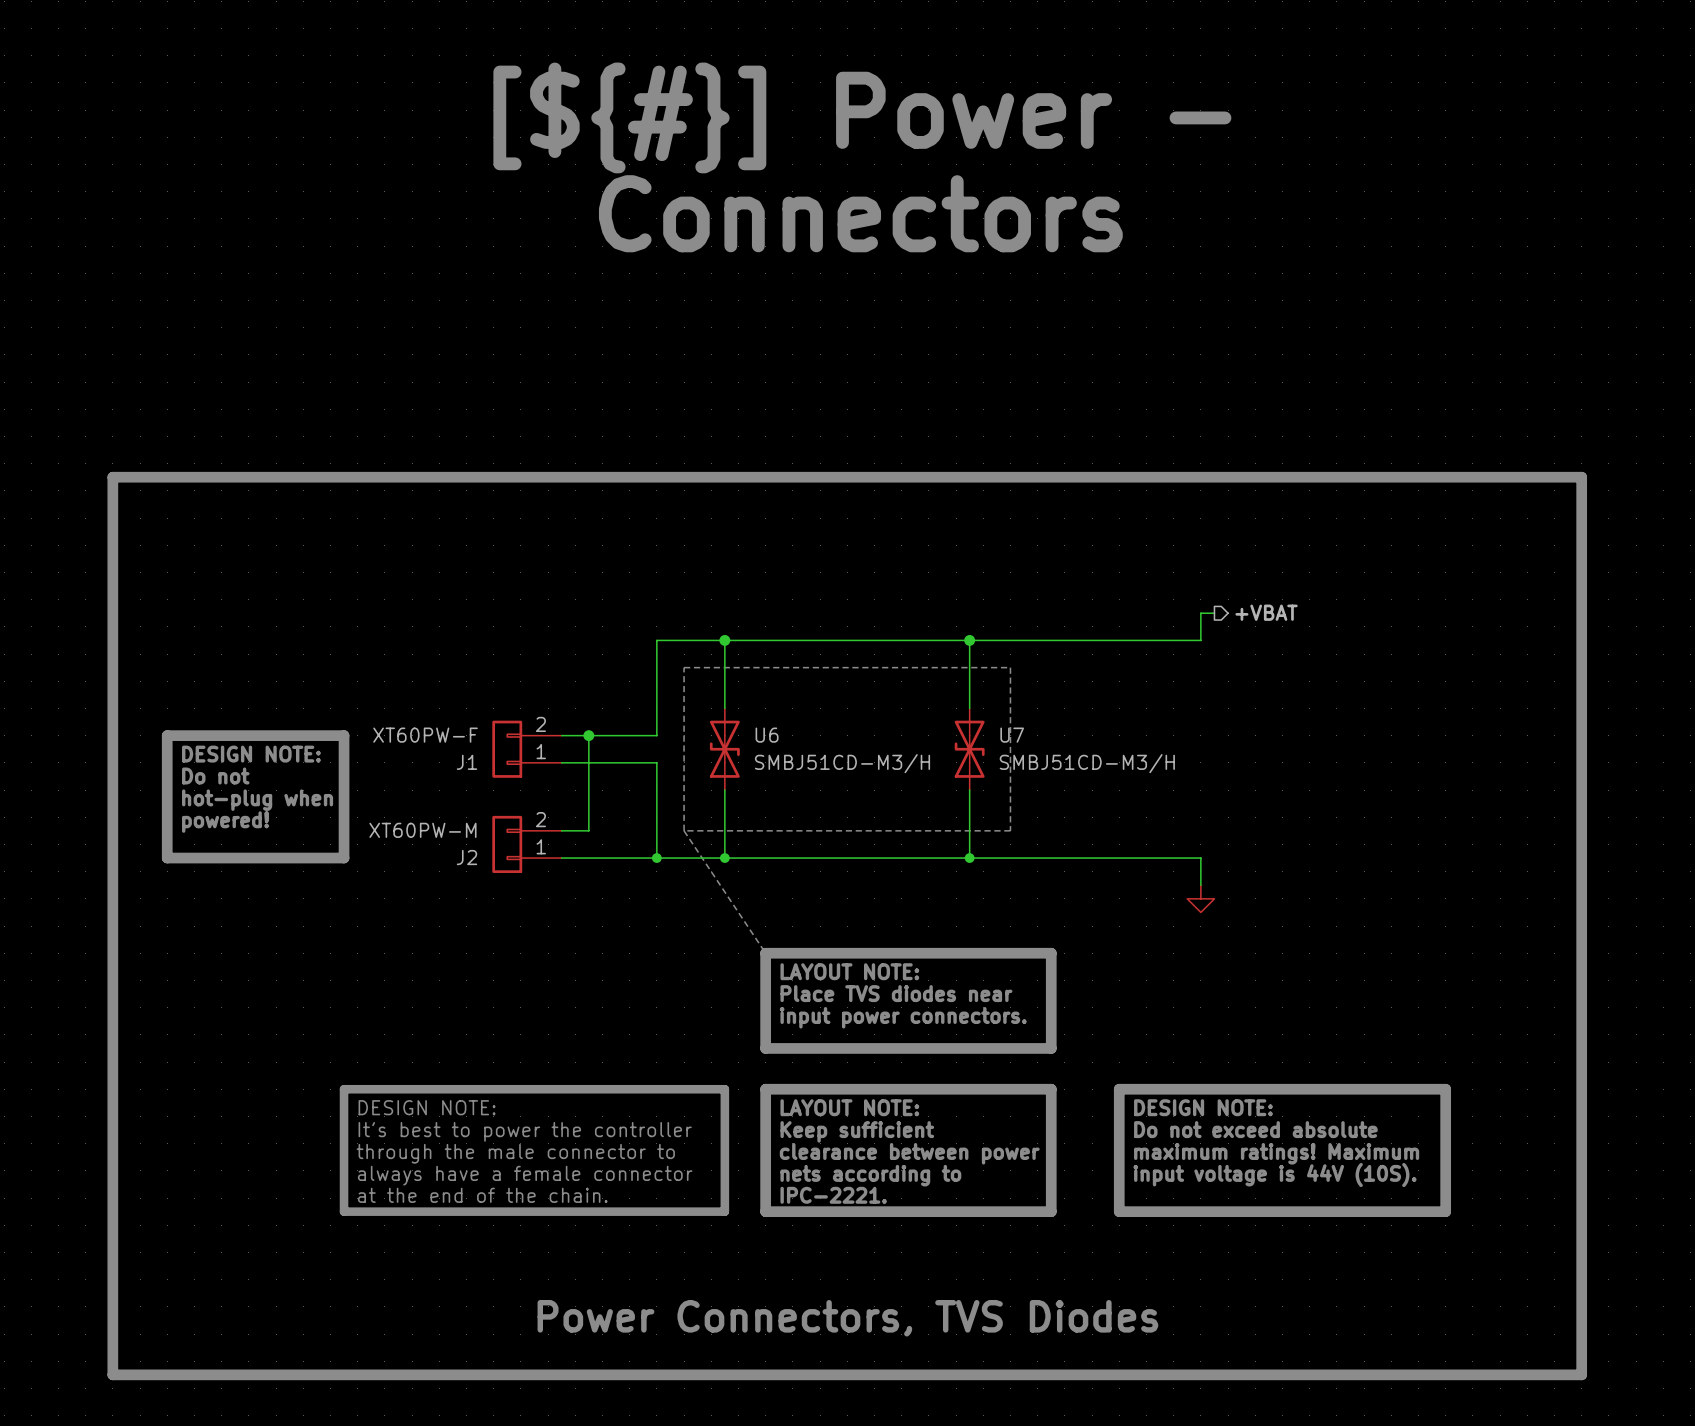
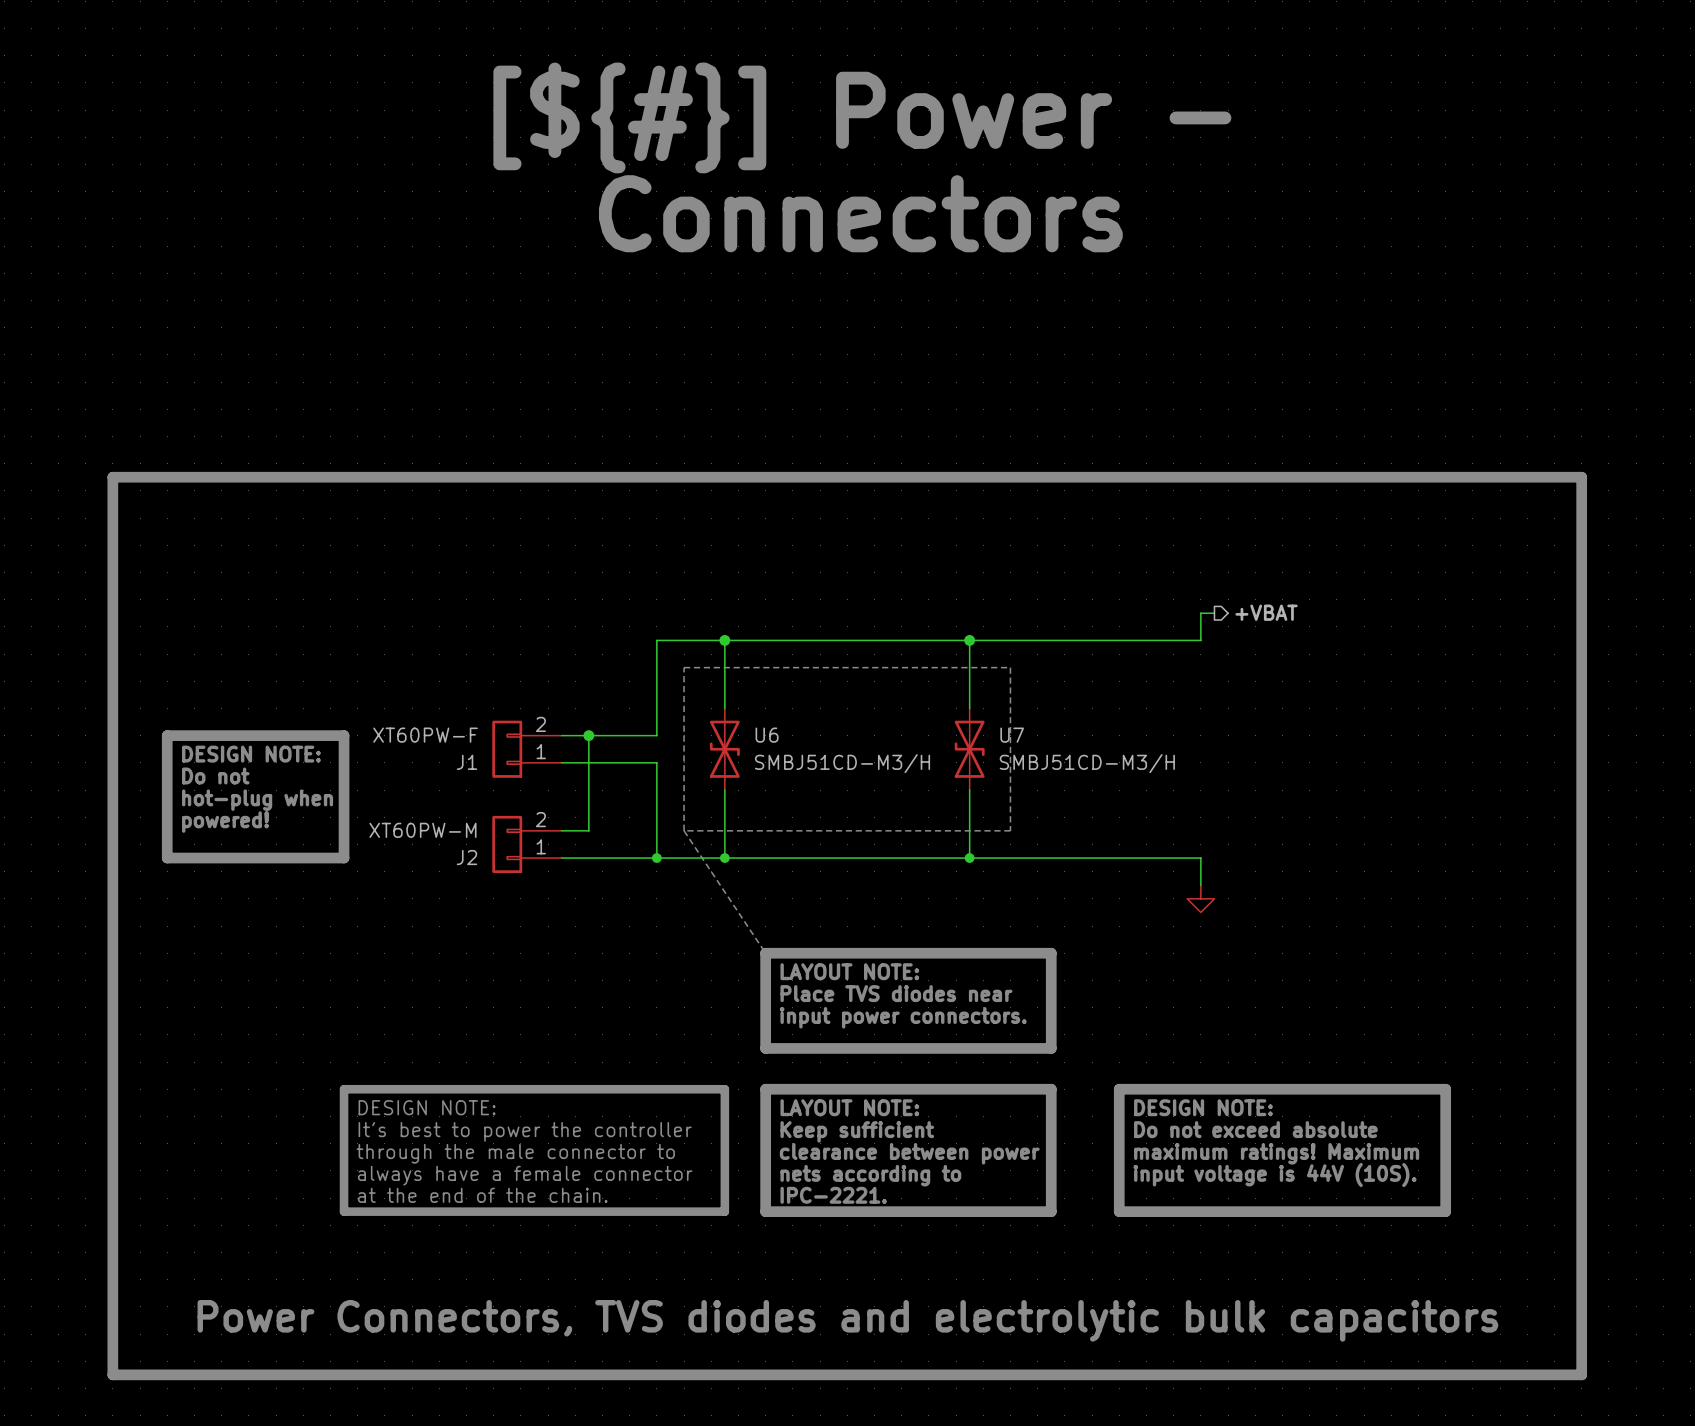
text: Power Connectors, TVS Diodes (847, 1318) -> Power Connectors, TVS diodes and electrolytic bulk capacitors (847, 1320)

